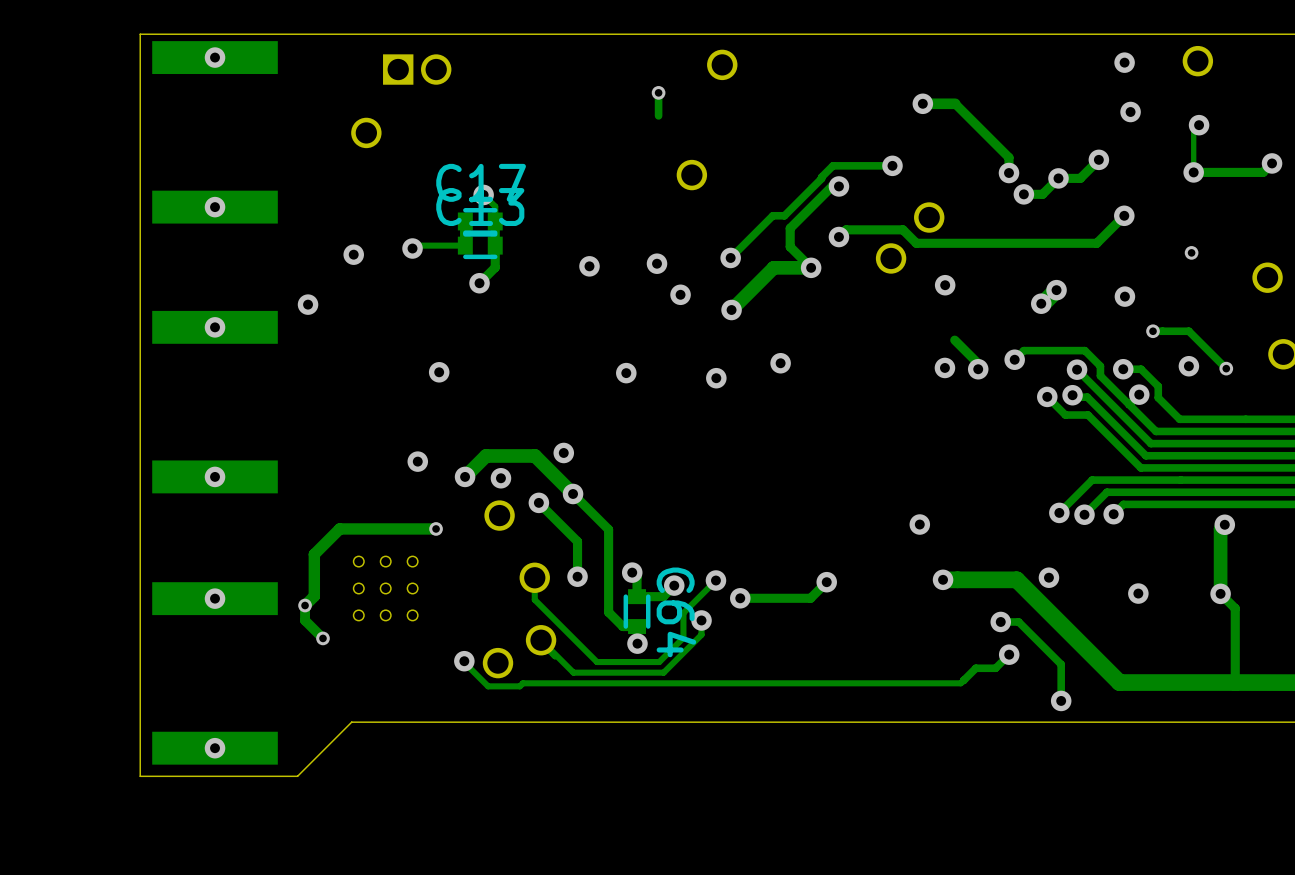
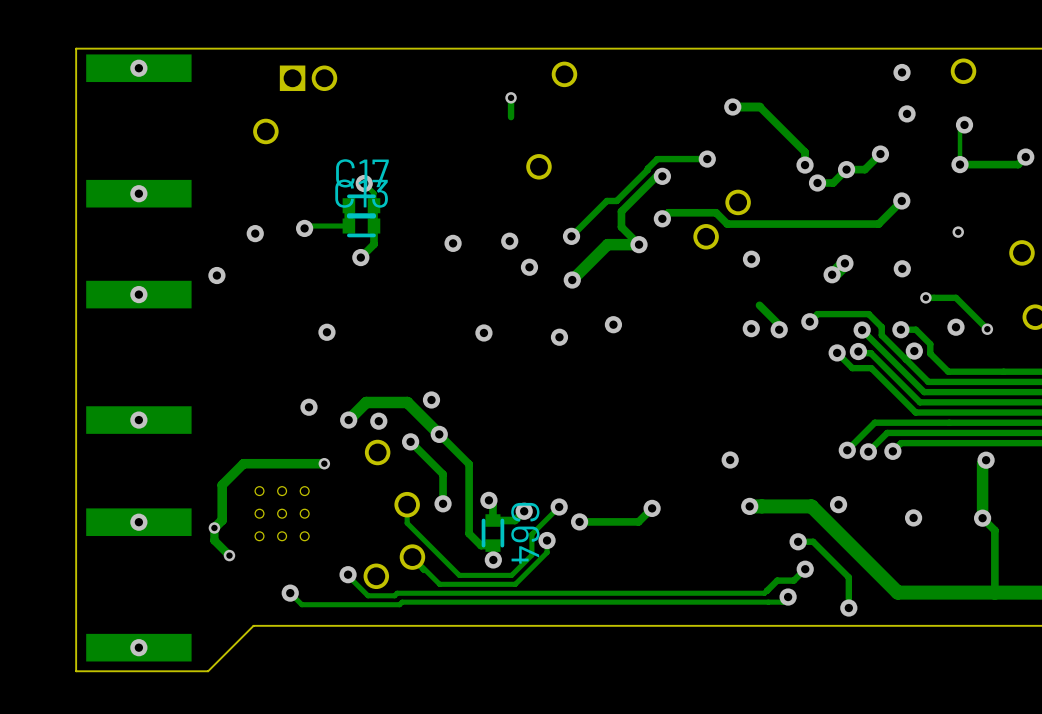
track: none -> (290, 593) (301, 604) (399, 604) (402, 602) (782, 602) (788, 597)
via: none -> (290, 593)
via: none -> (788, 597)

